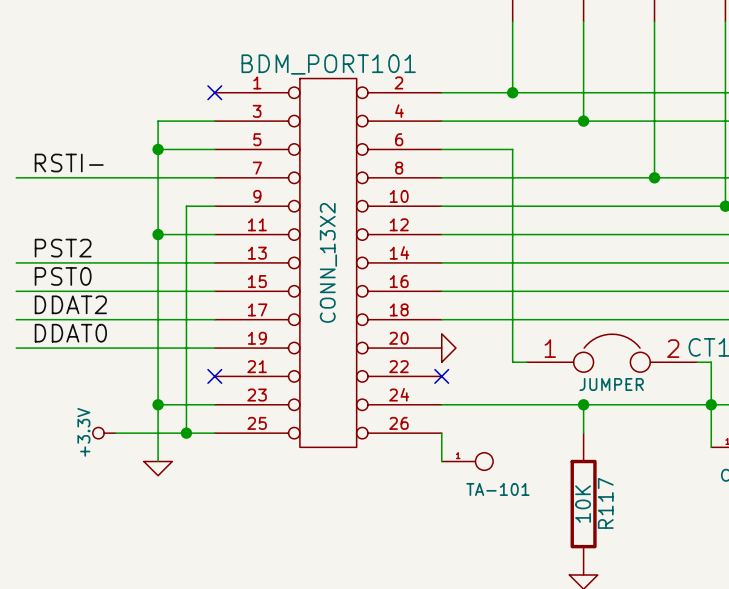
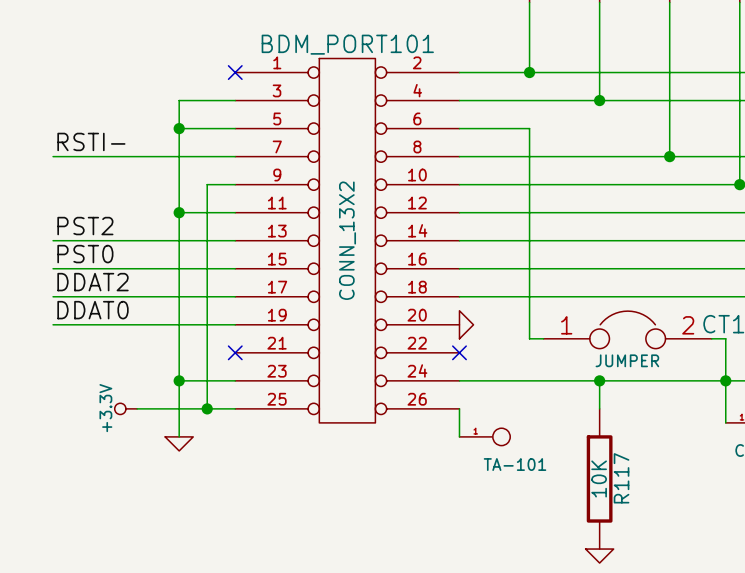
wire: (16, 177) (30, 177) -> none
wire: (16, 262) (30, 262) -> none
wire: (16, 291) (30, 291) -> none
wire: (16, 319) (30, 319) -> none
wire: (16, 348) (30, 348) -> none

